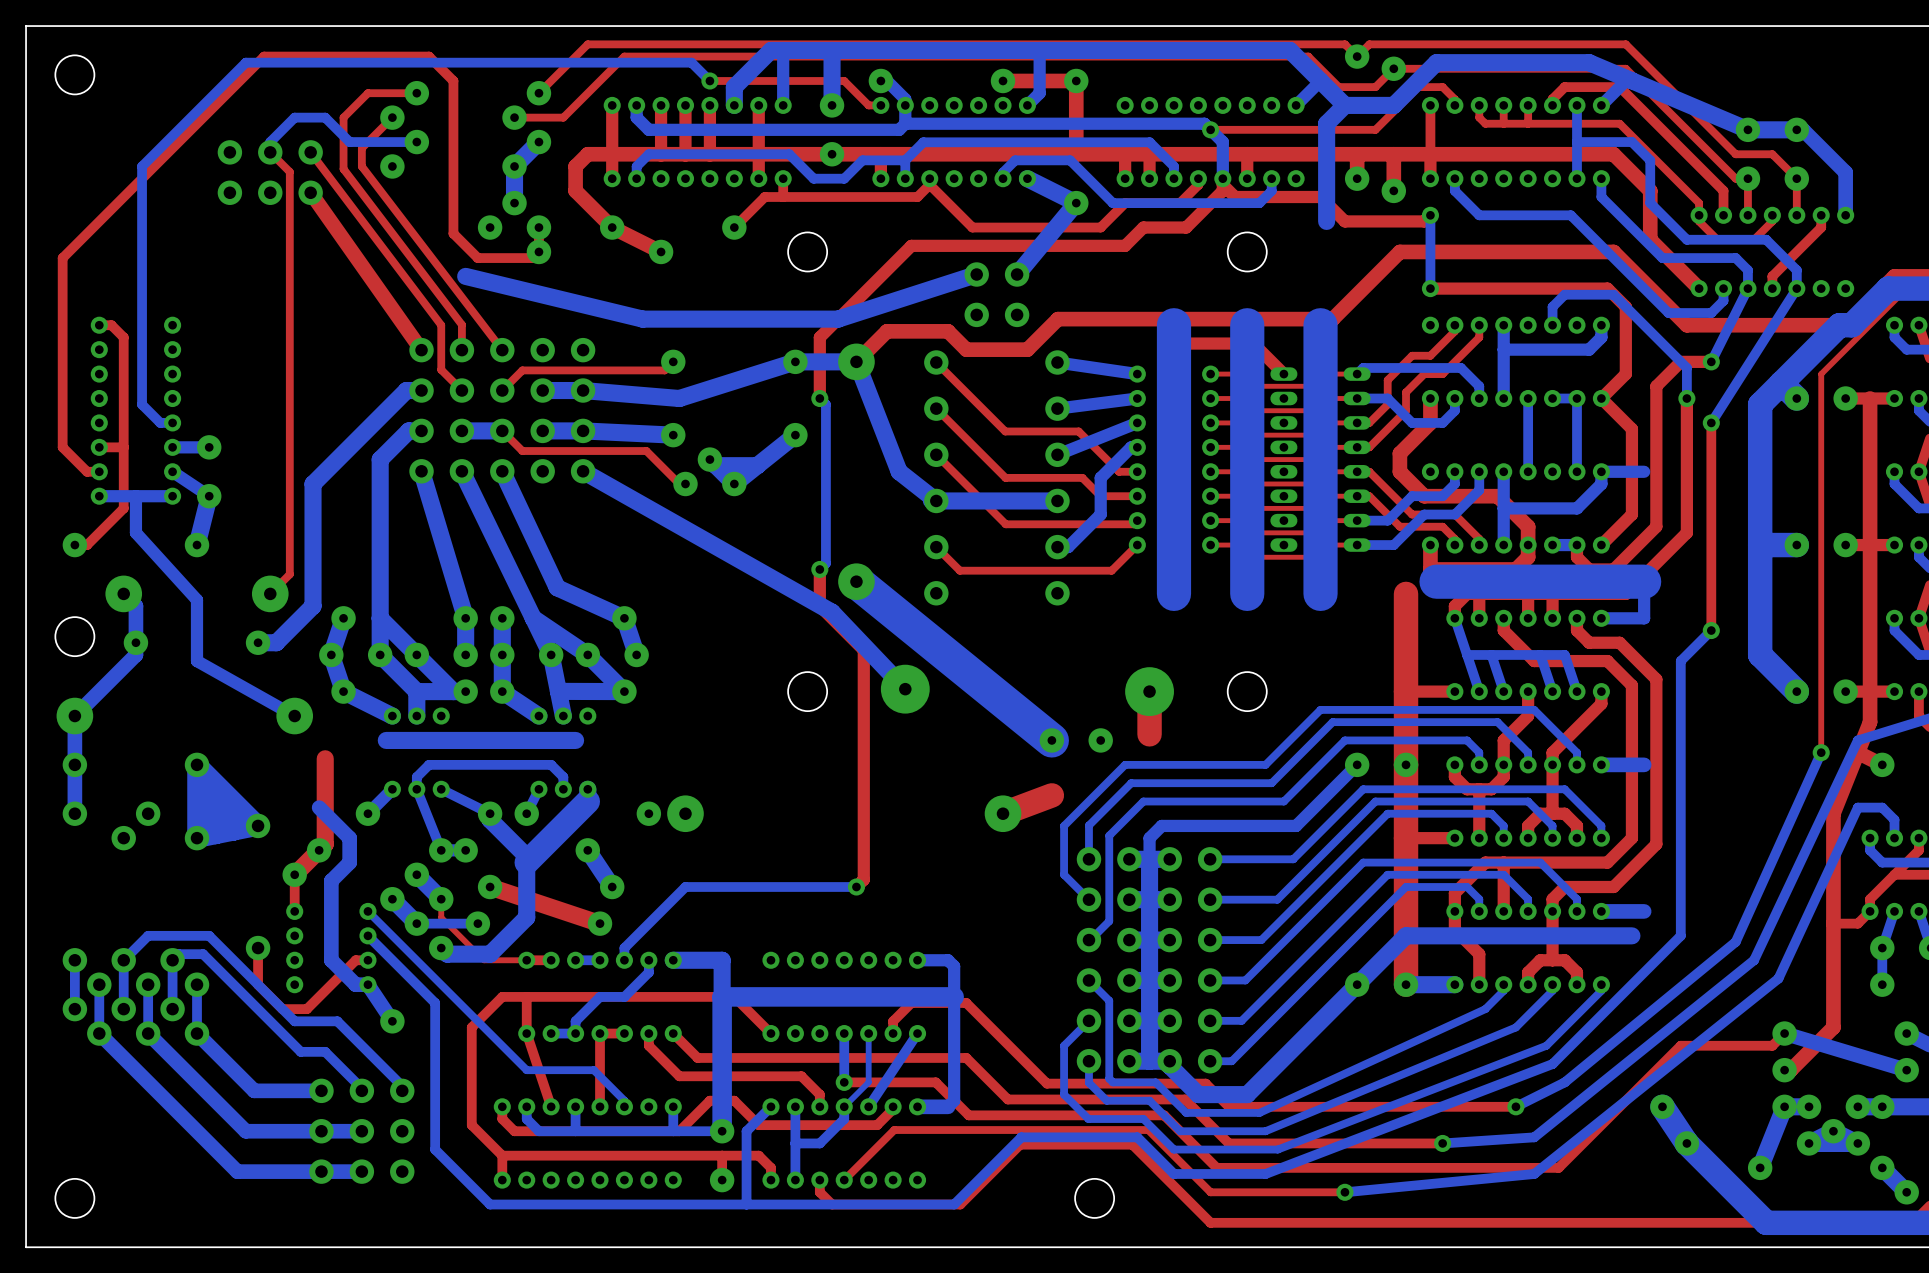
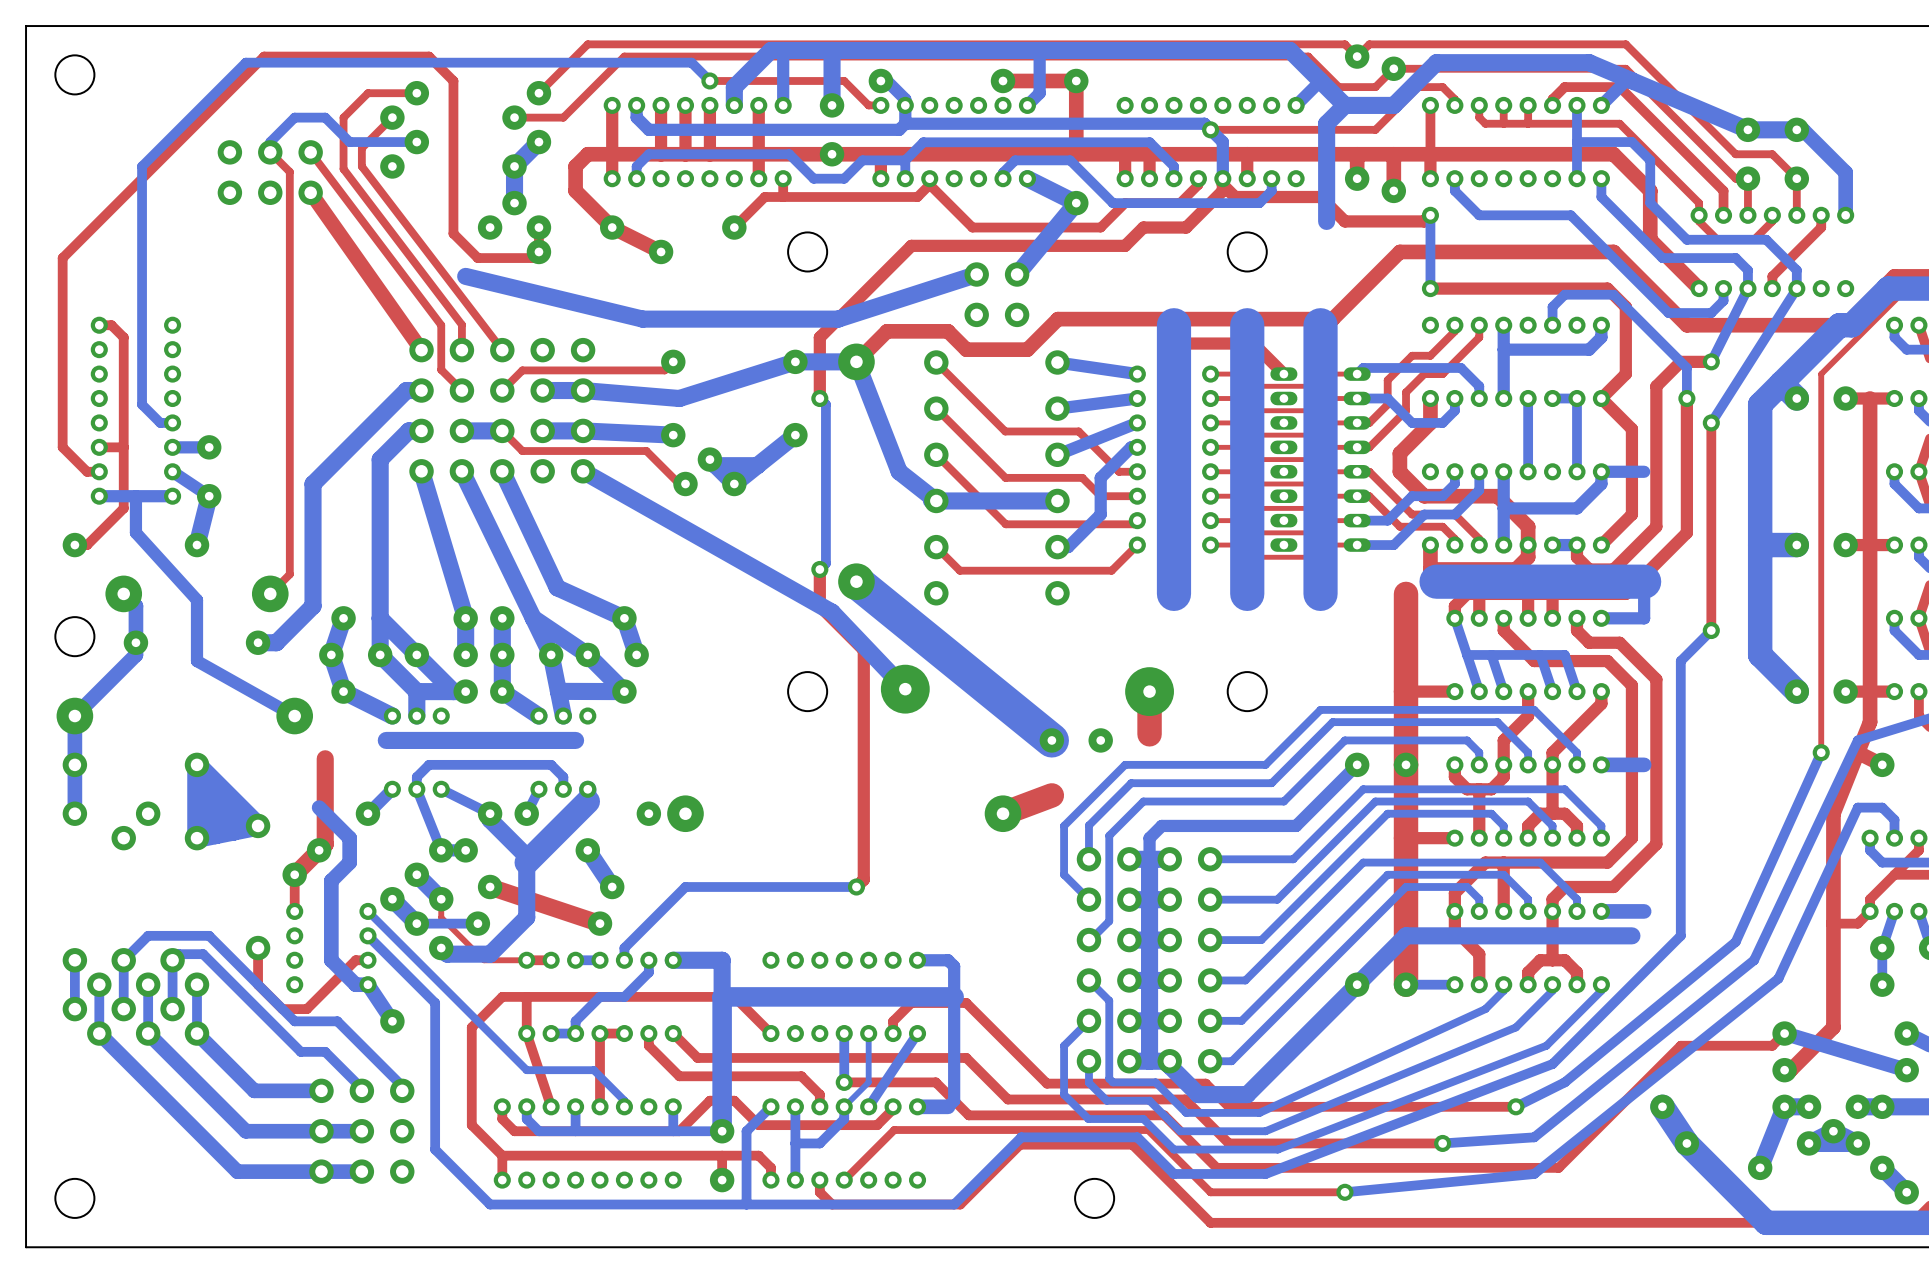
bottom track width: thick (1454, 984) (1406, 984) -> thin (1454, 984) (1406, 984)

